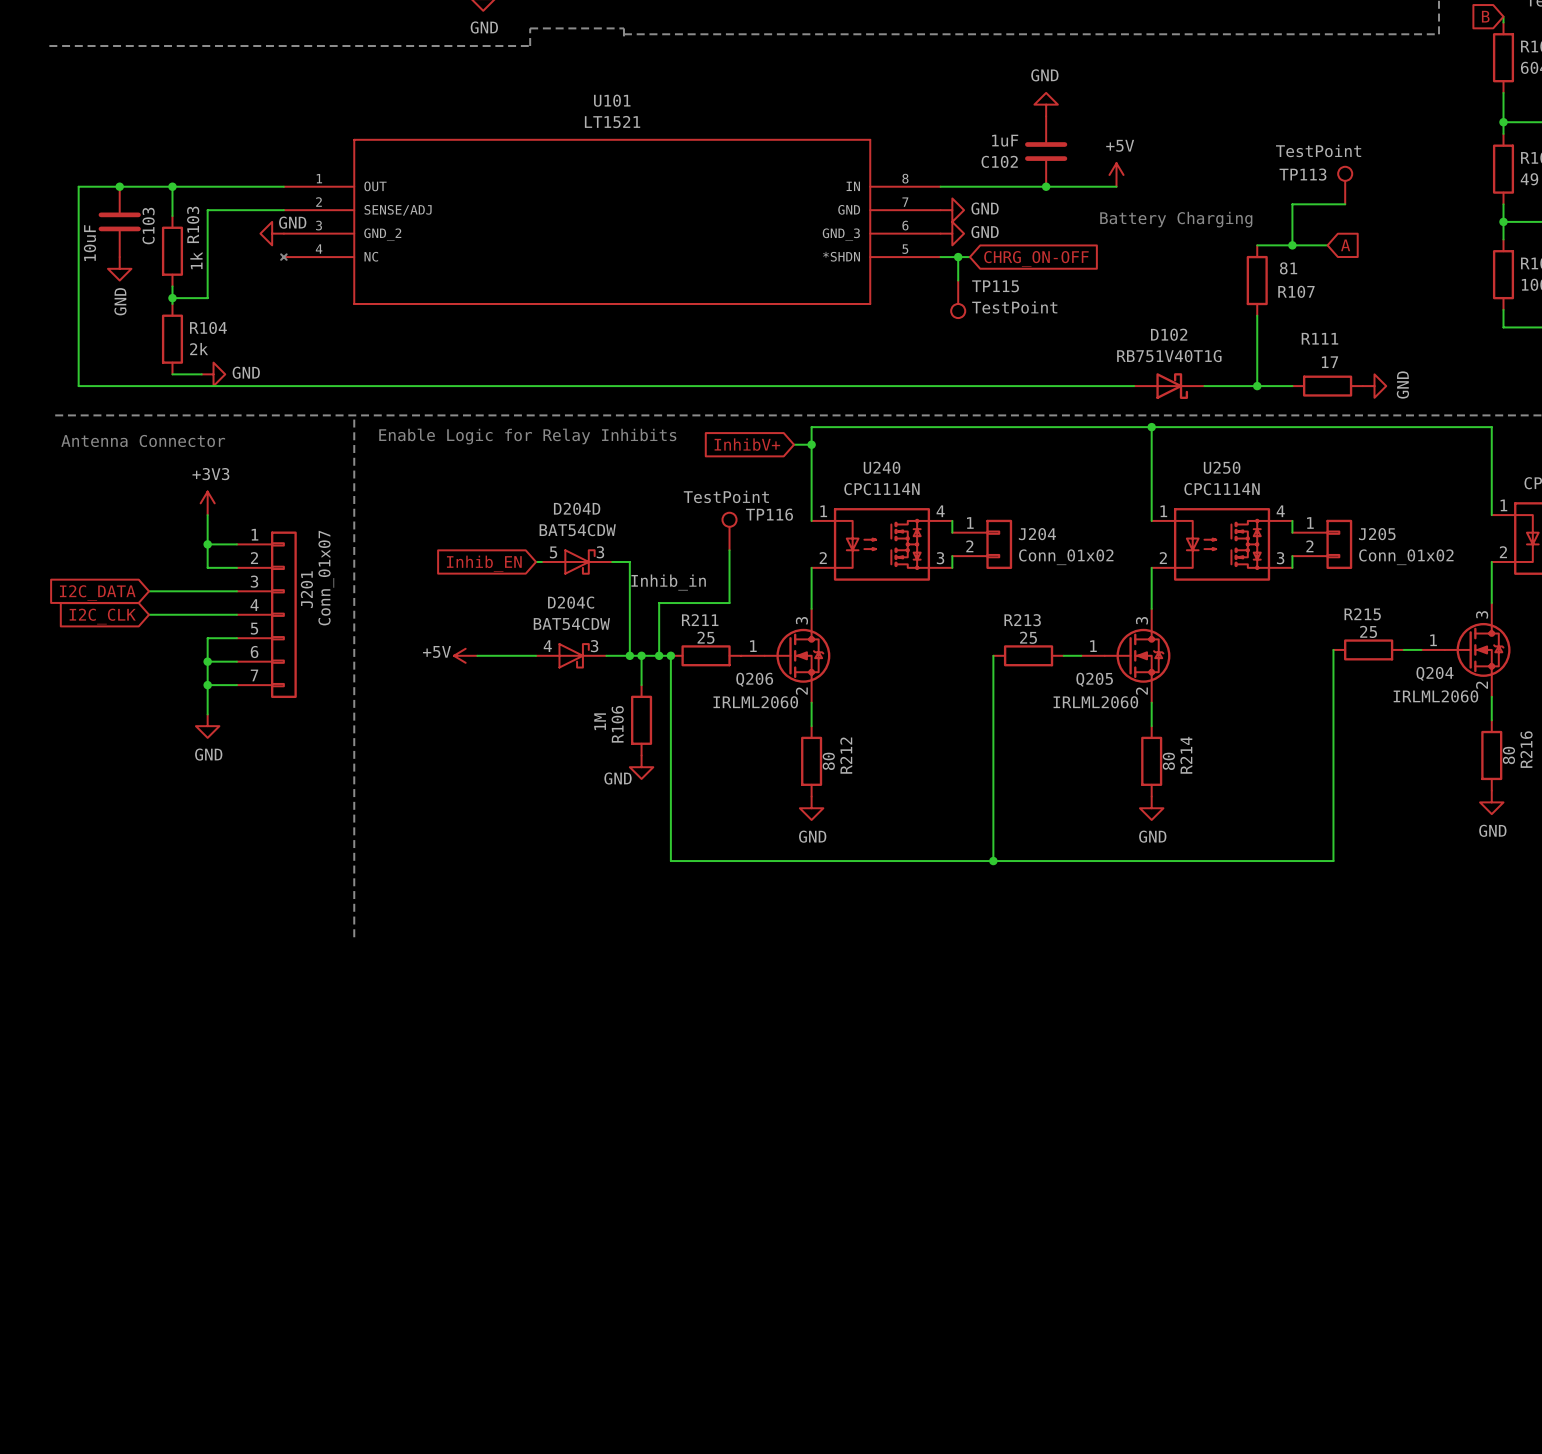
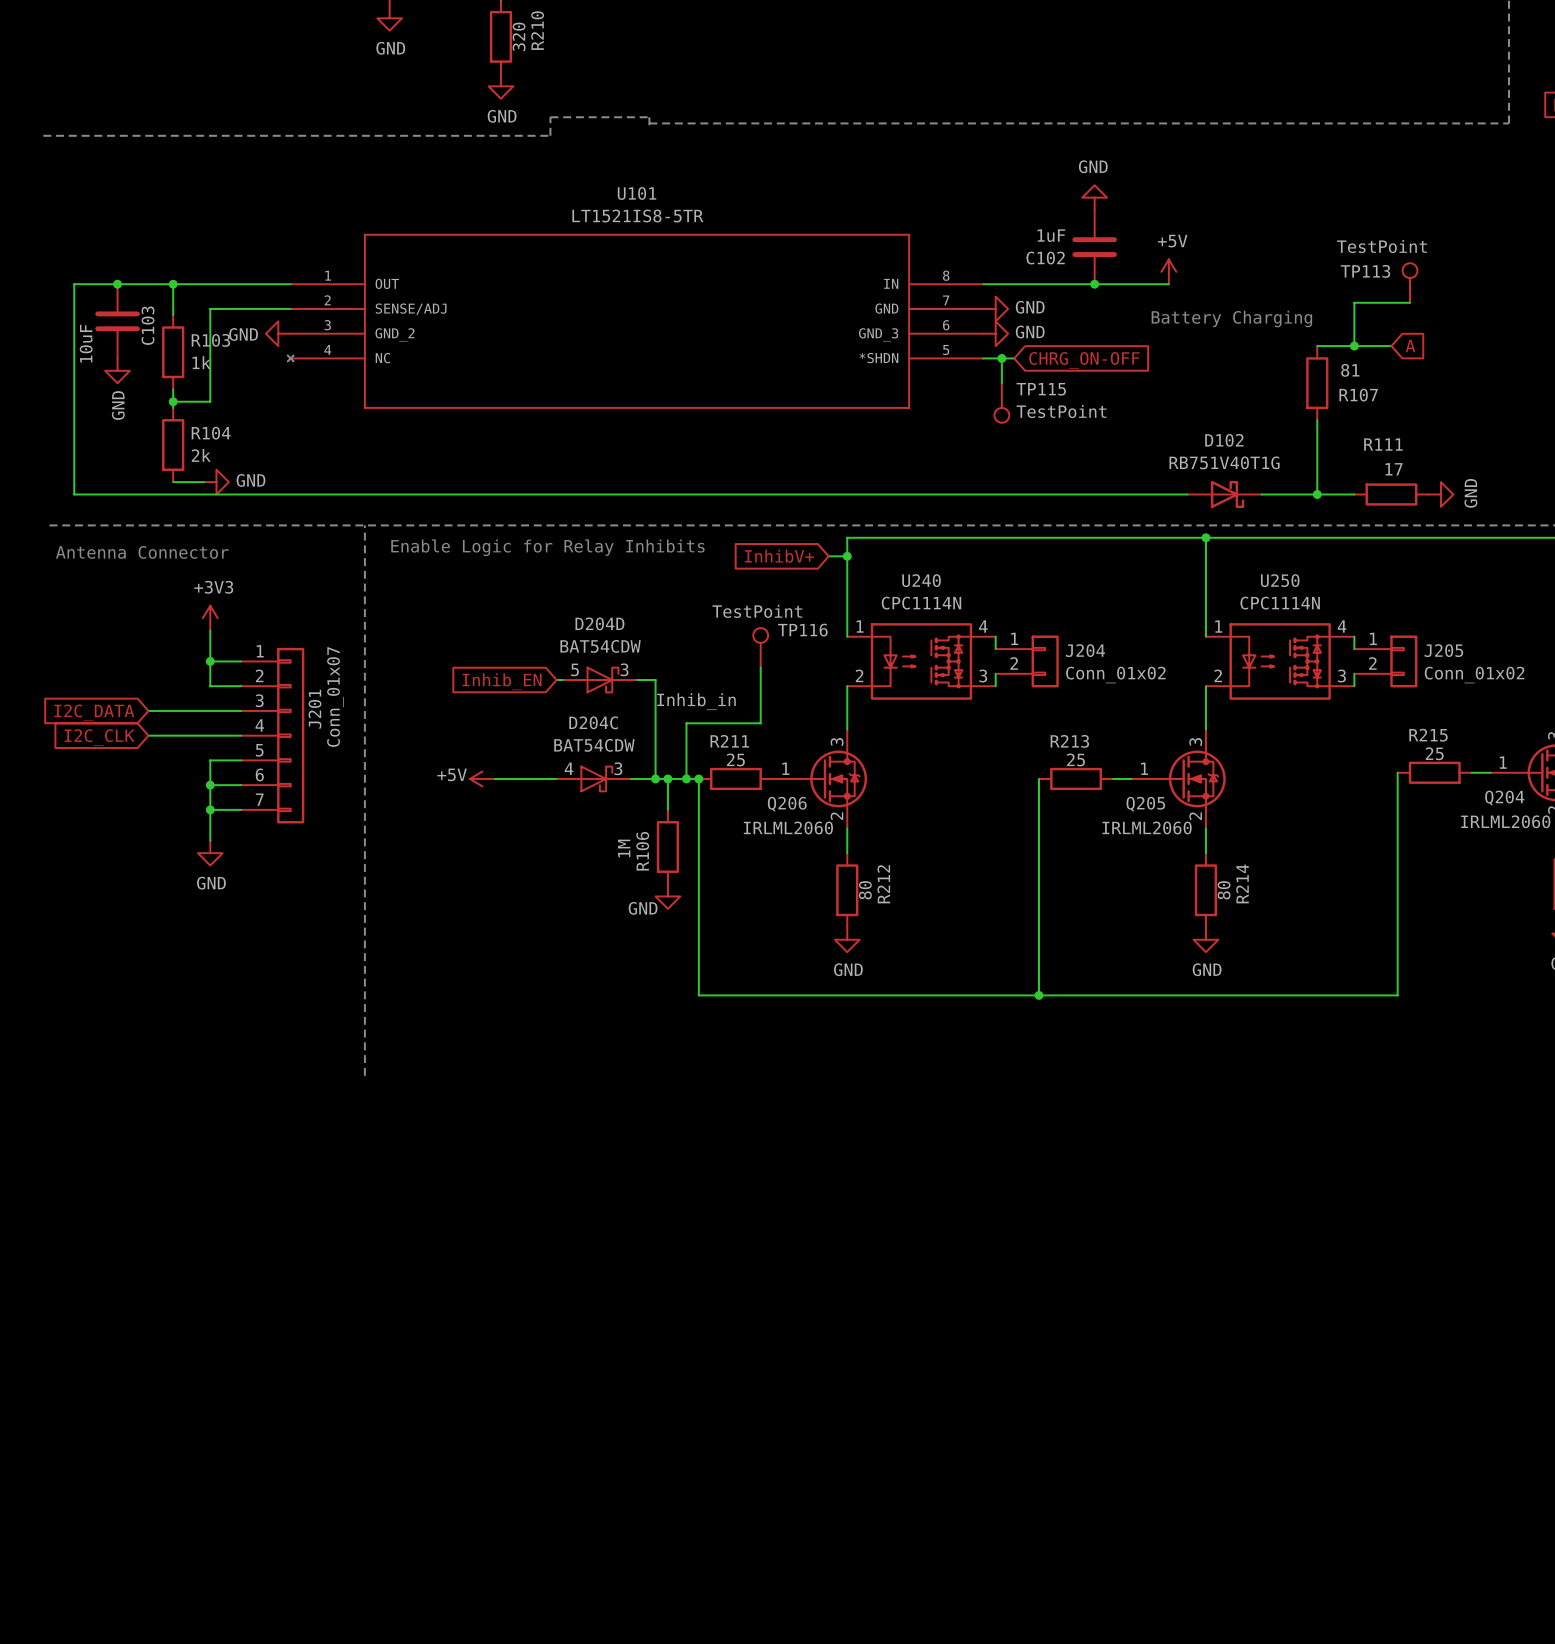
U101 value: LT1521 (612, 122) -> LT1521IS8-5TR (637, 215)
power symbol text position: GND (292, 222) -> GND (243, 334)
R103 name rotation: 0° (193, 224) -> 90° clockwise (210, 340)
R103 value rotation: 0° (196, 260) -> 90° clockwise (201, 362)

